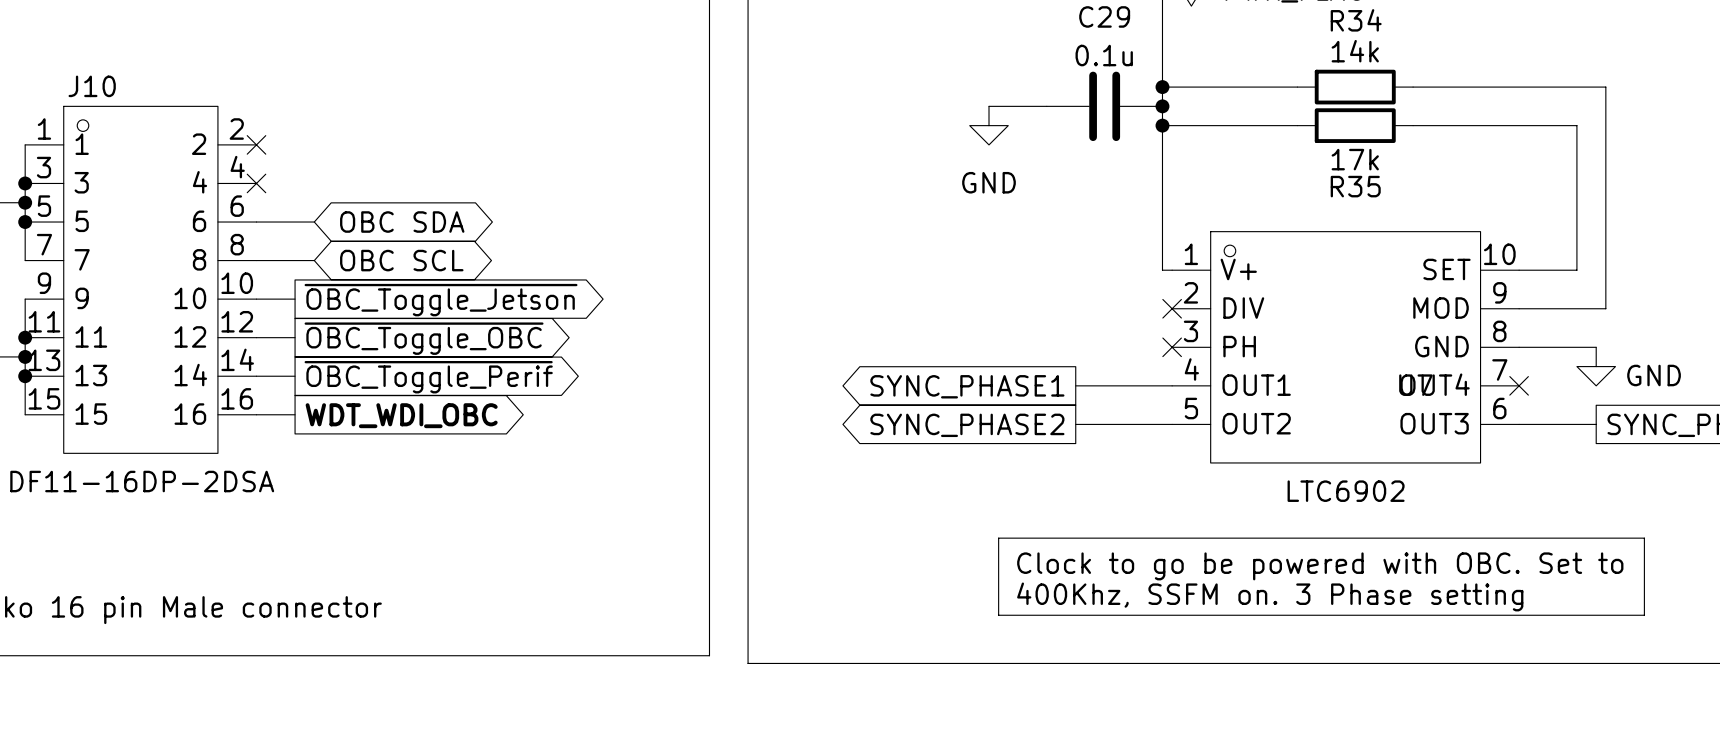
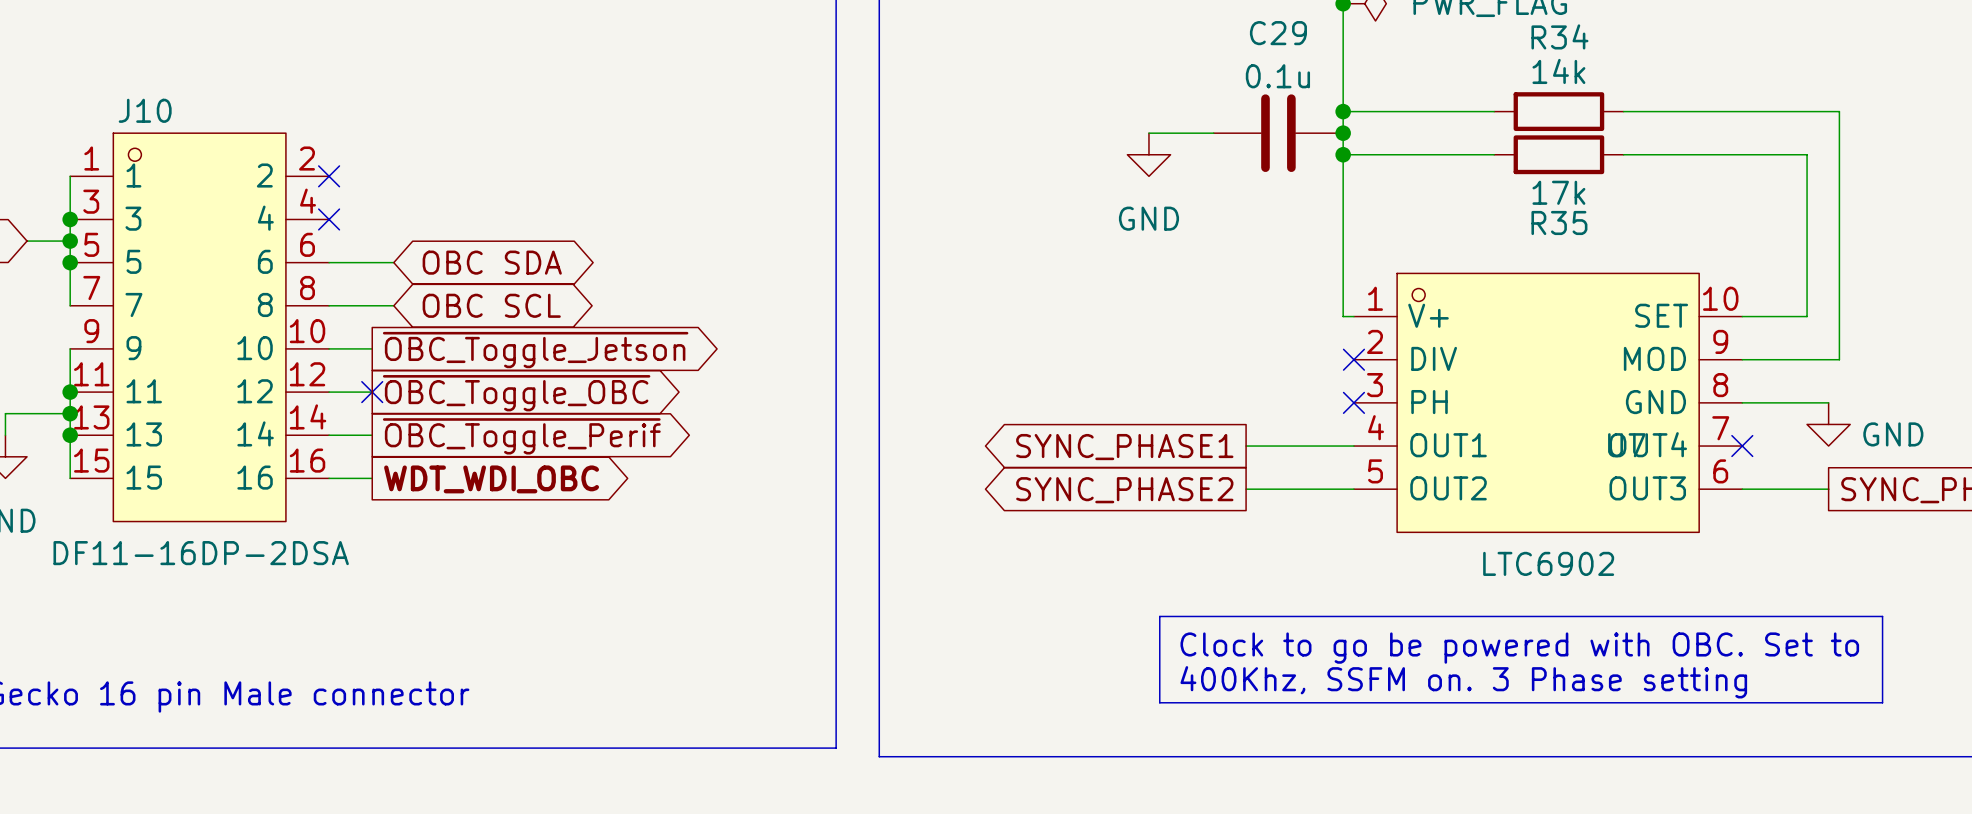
no-connect mark: none -> (372, 392)

